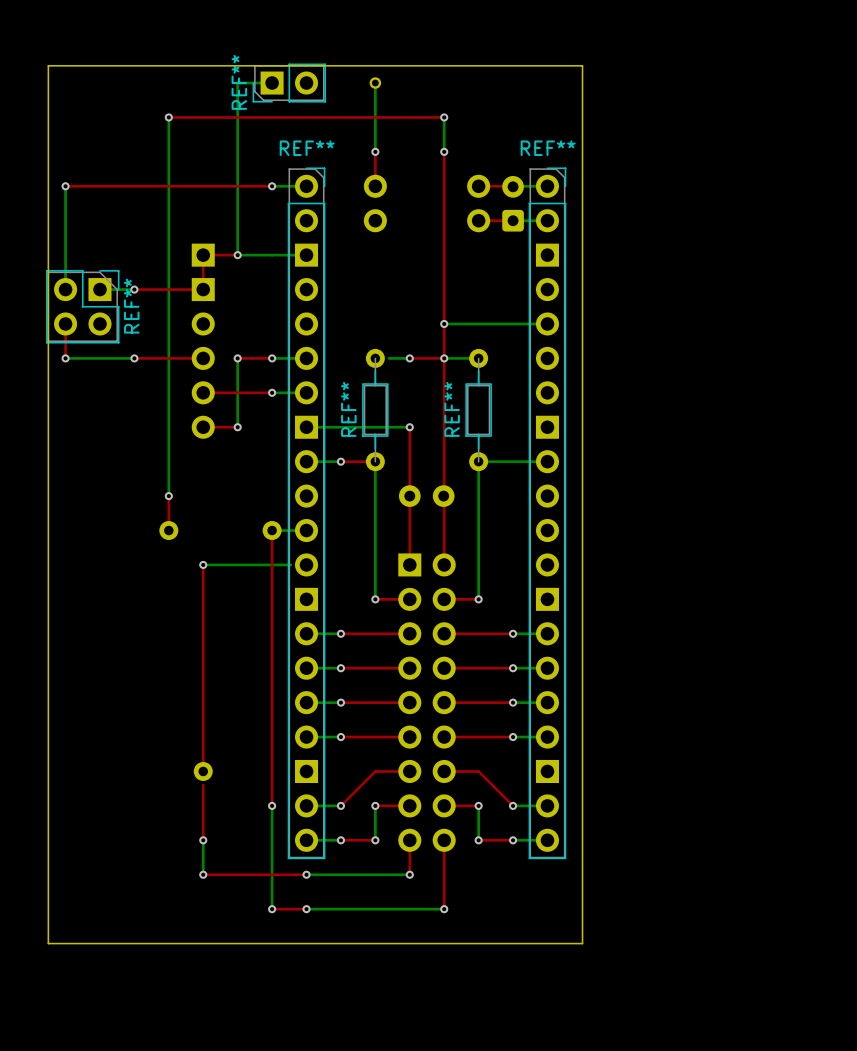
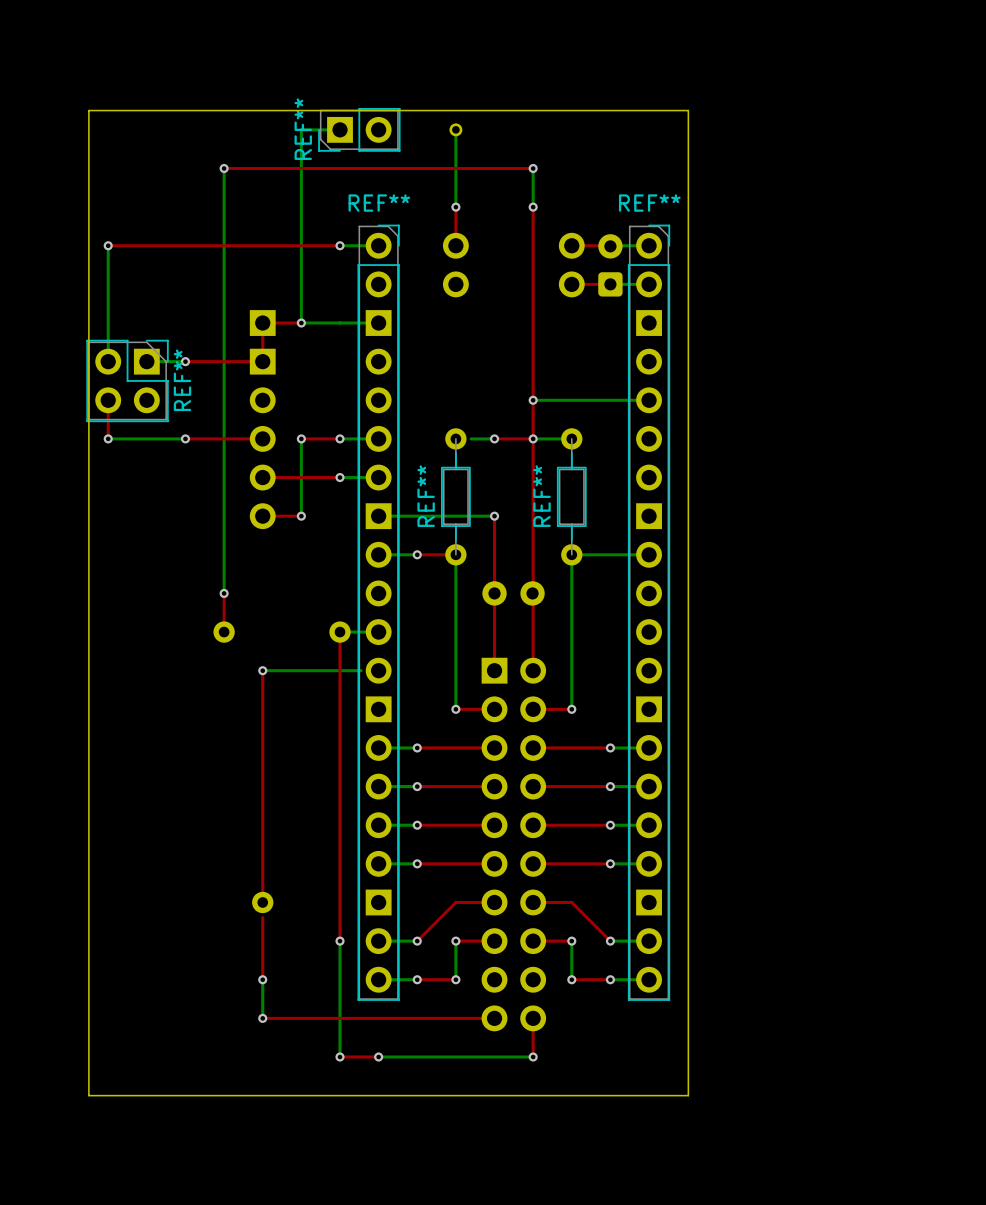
part: (427, 702) -> none
part: none -> (513, 844)
top track: (409, 840) (409, 874) -> (378, 1018) (494, 1018)
top track: (444, 840) (444, 874) -> none
bottom track: (306, 874) (409, 874) -> none
via: (306, 874) -> none
via: (409, 874) -> none

